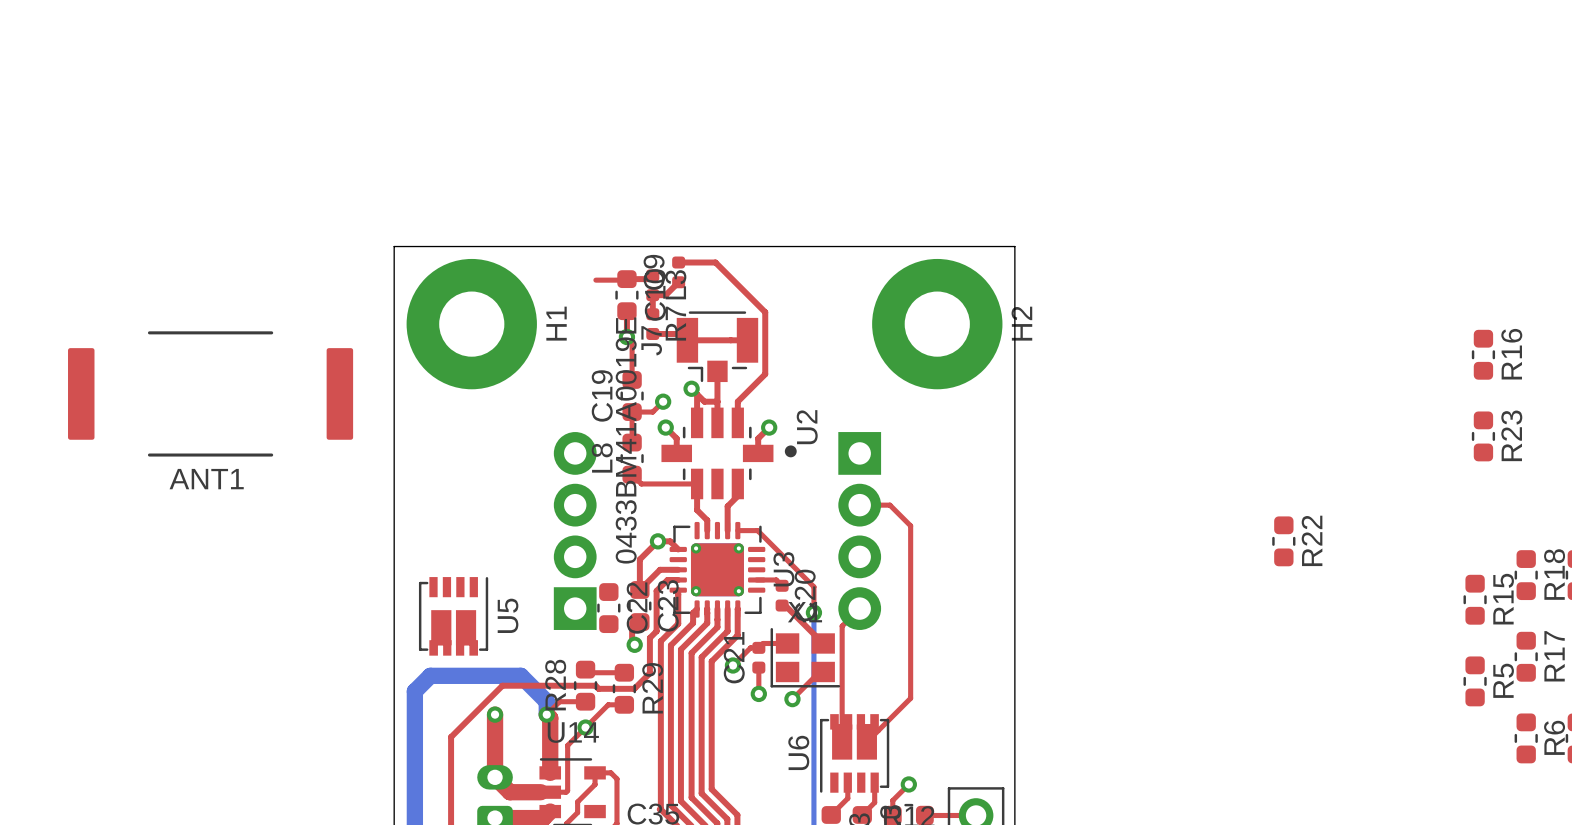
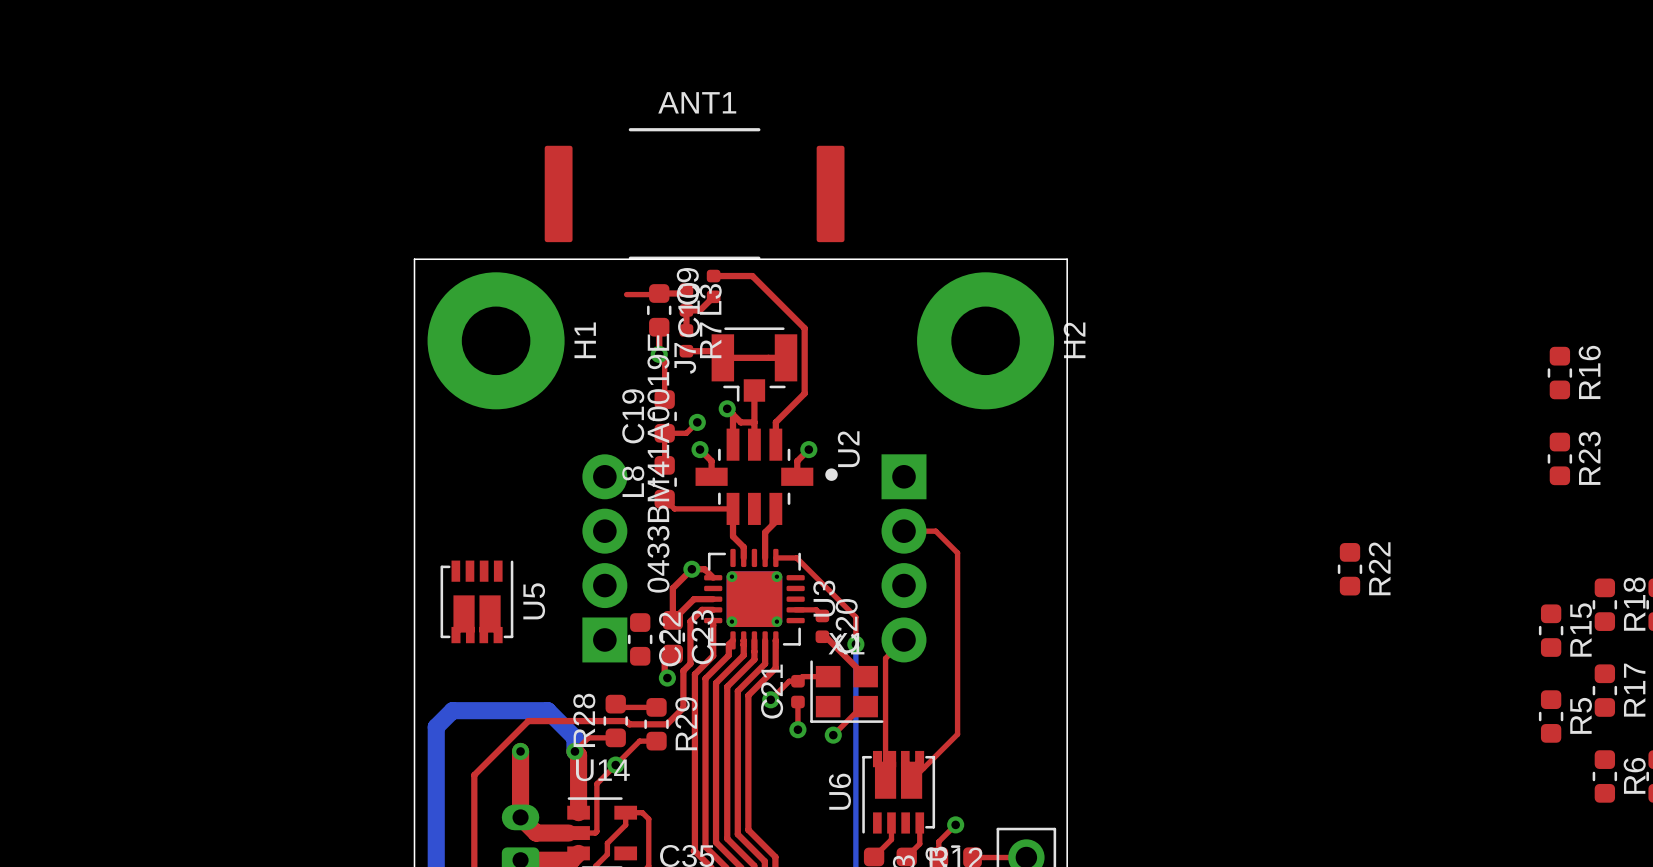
ANT1 position: (210, 393) -> (694, 193)
ANT1 name position: ANT1 (206, 479) -> ANT1 (697, 102)
U5 position: (453, 616) -> (476, 601)

